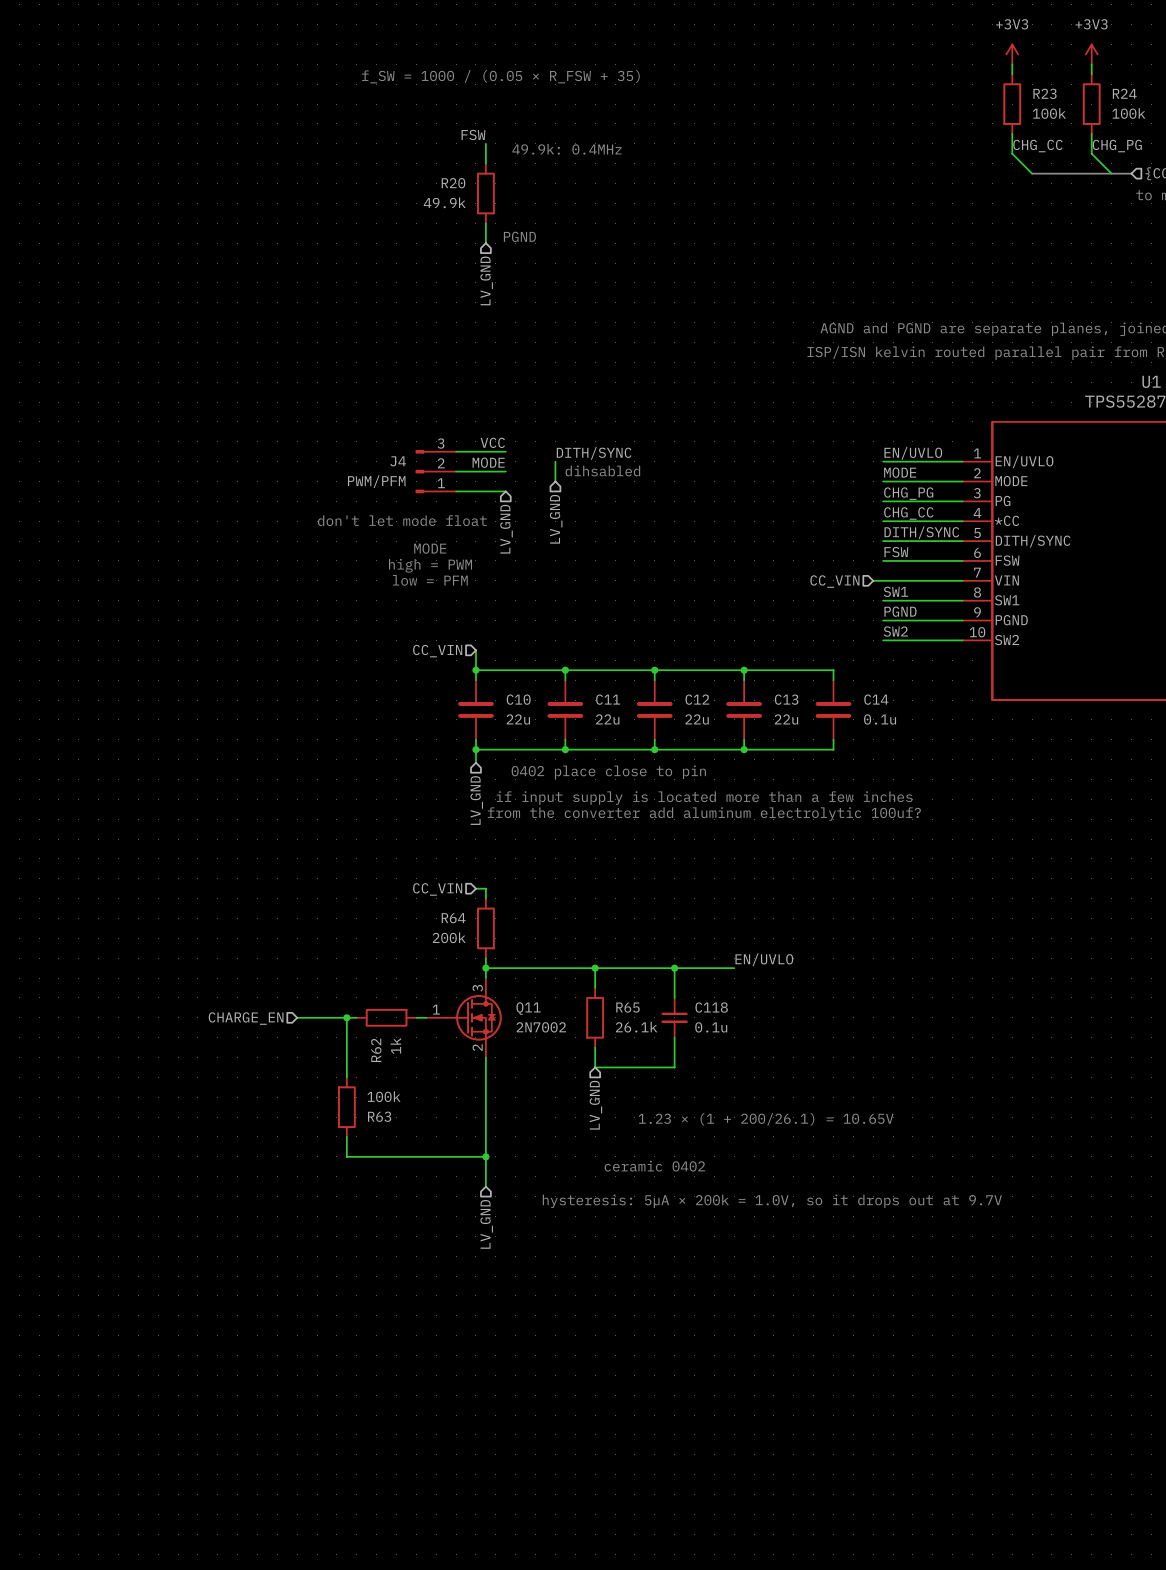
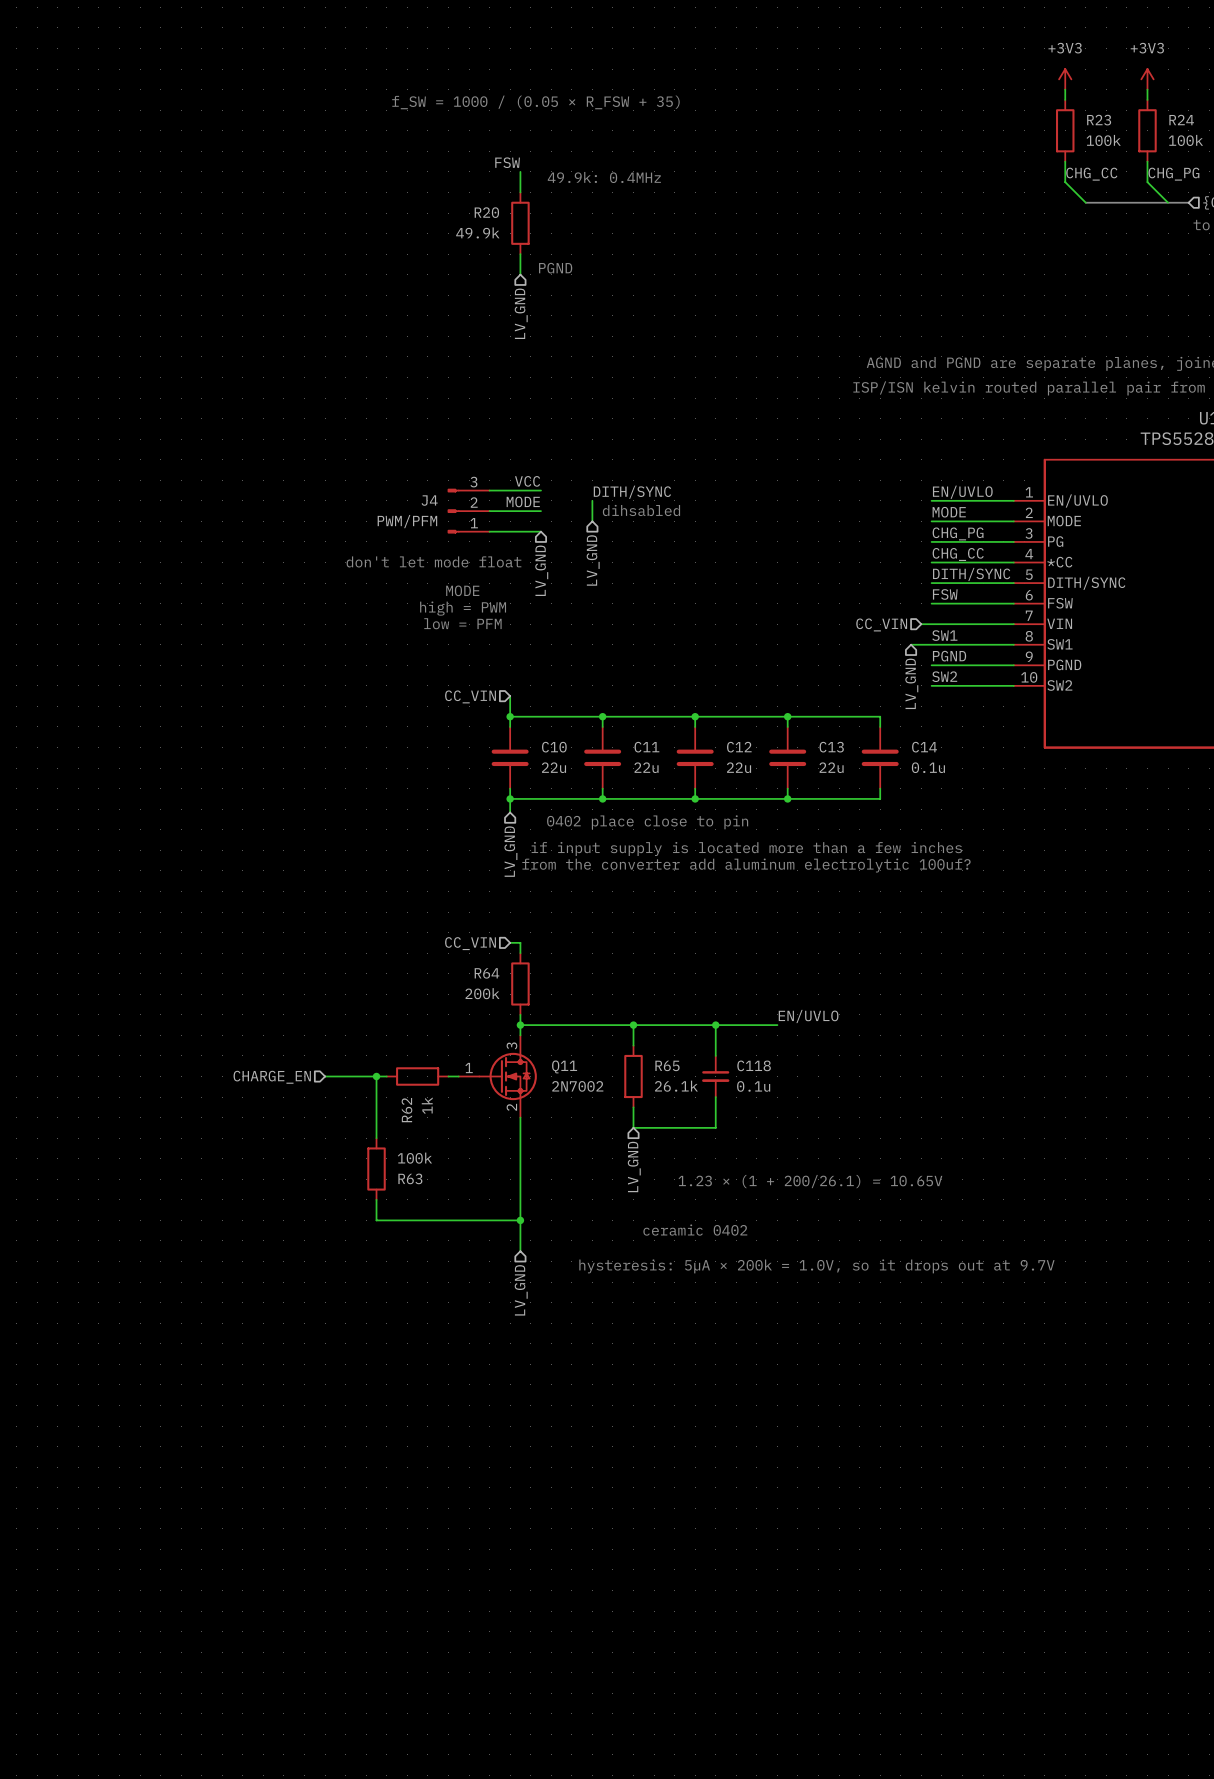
wire: none -> (911, 644) (931, 644)
hierarchical label: none -> LV_GND (911, 683)

